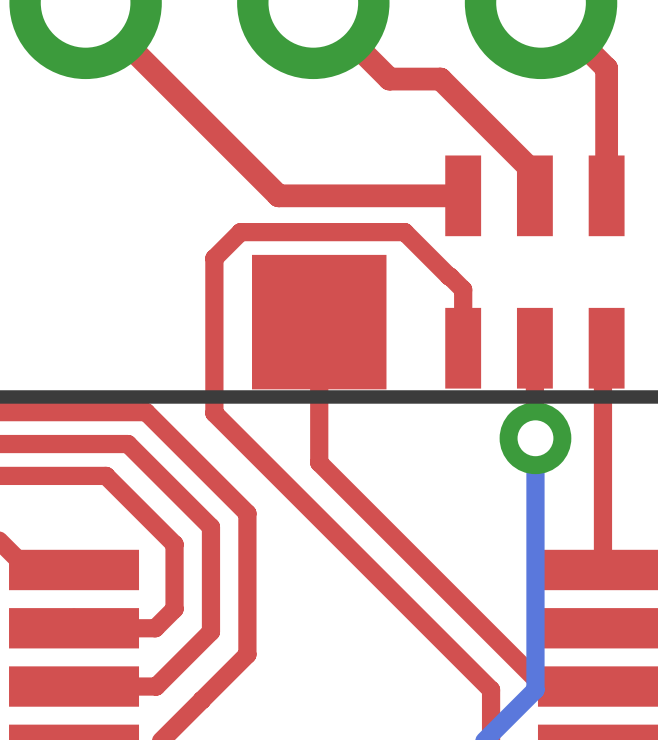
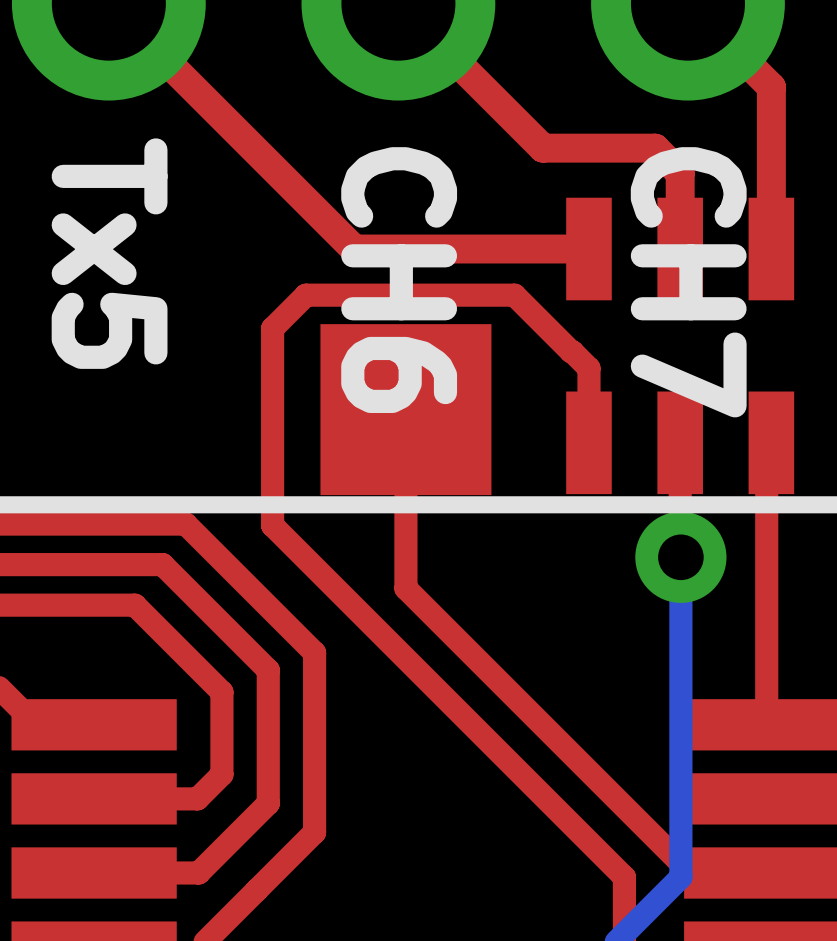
top track: (389, 79) (440, 79) (534, 173) -> (495, 100) (542, 148) (655, 148) (680, 173) (680, 220)
text: none -> Tx5 (109, 253)
text: none -> CH6 (399, 280)
text: none -> CH7 (688, 282)

